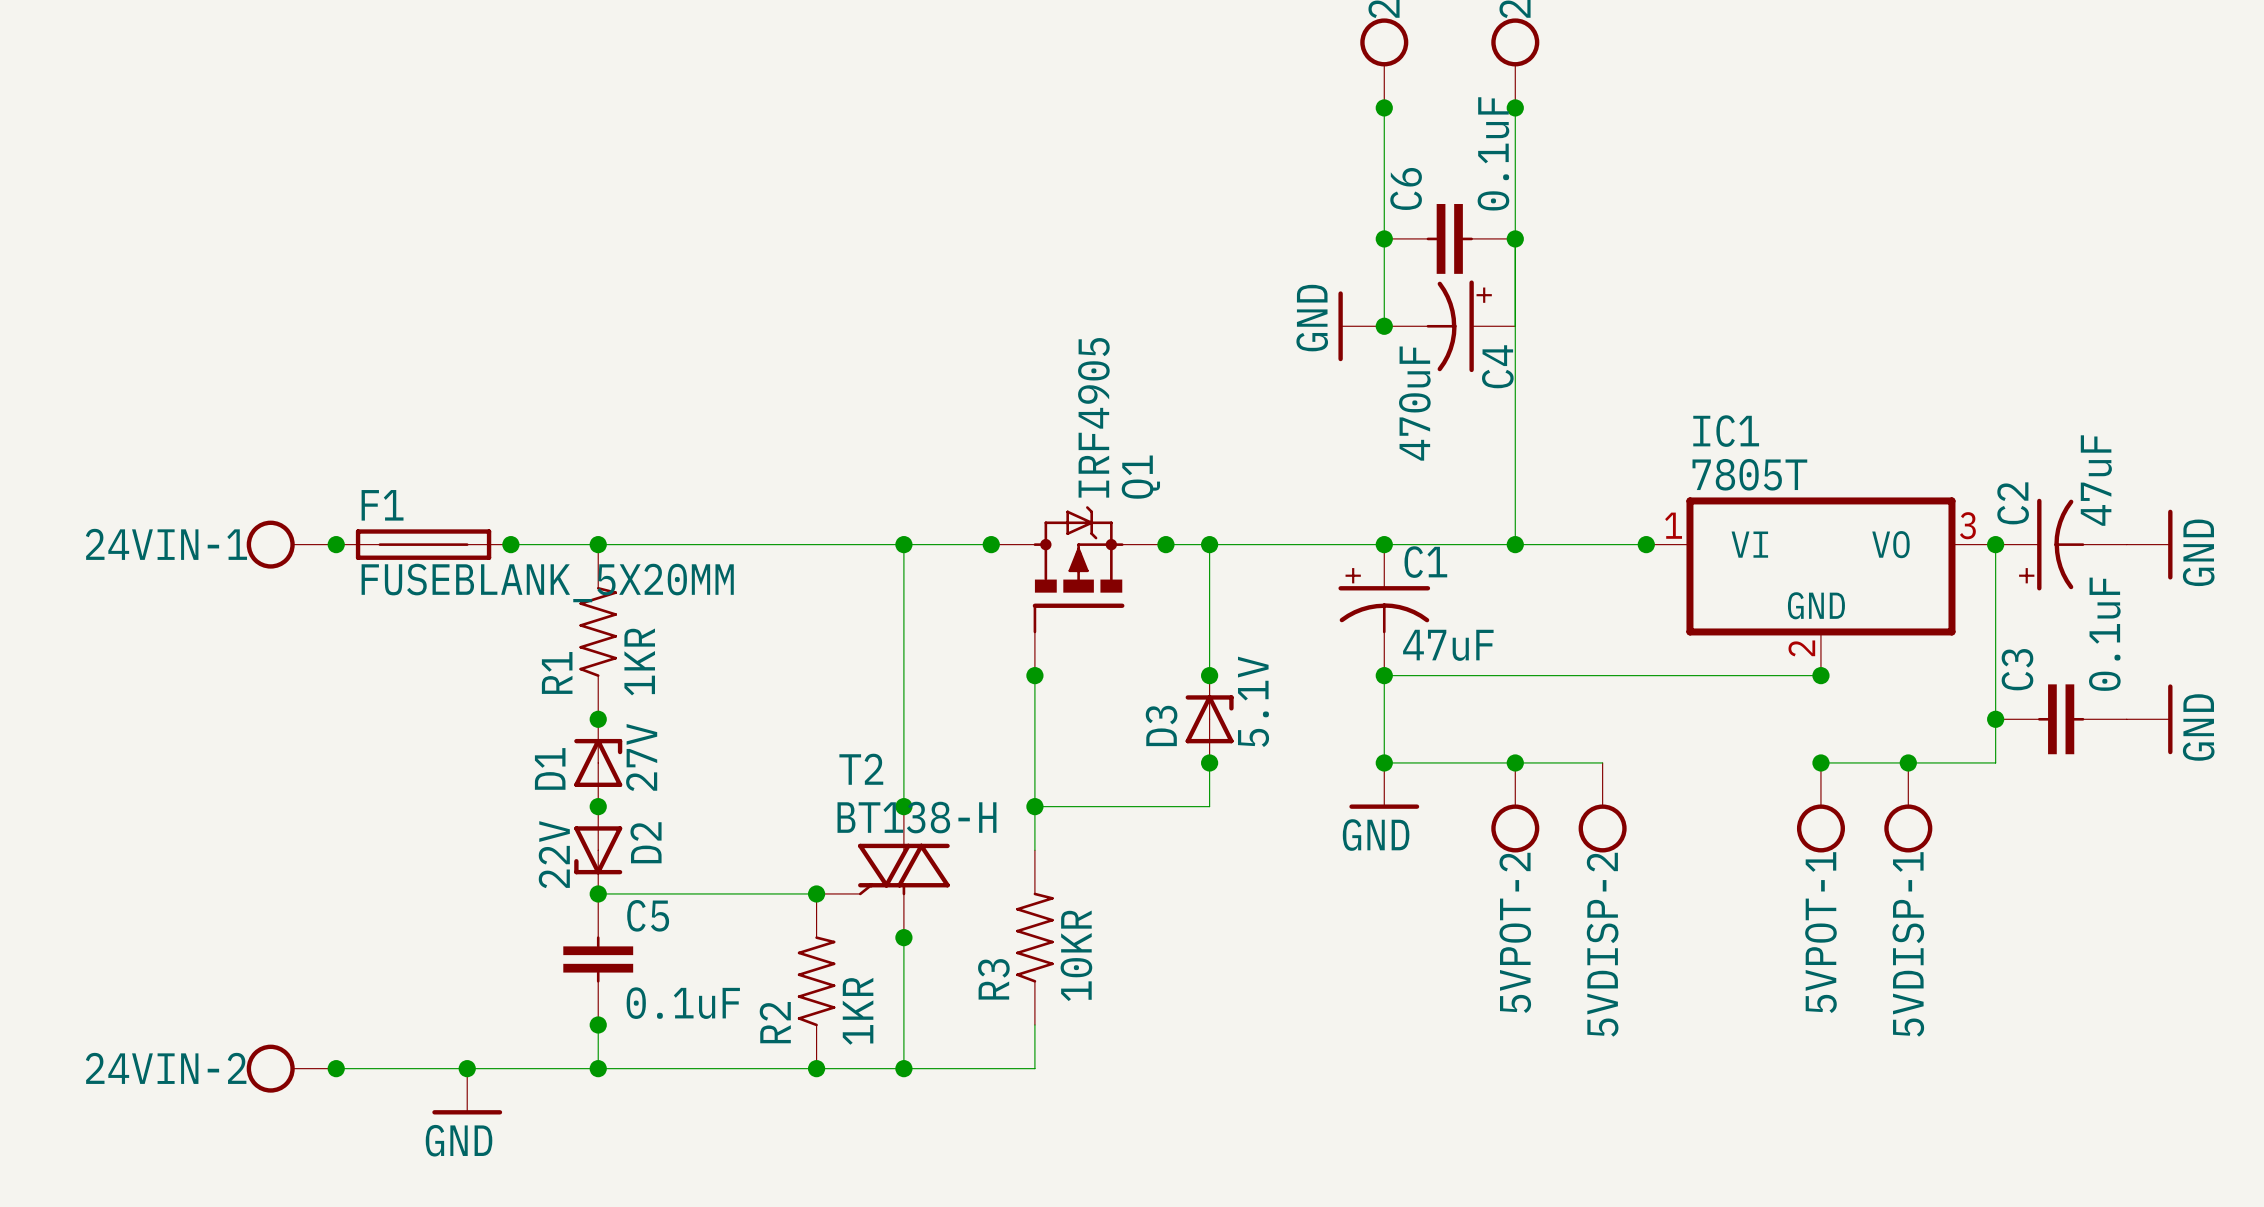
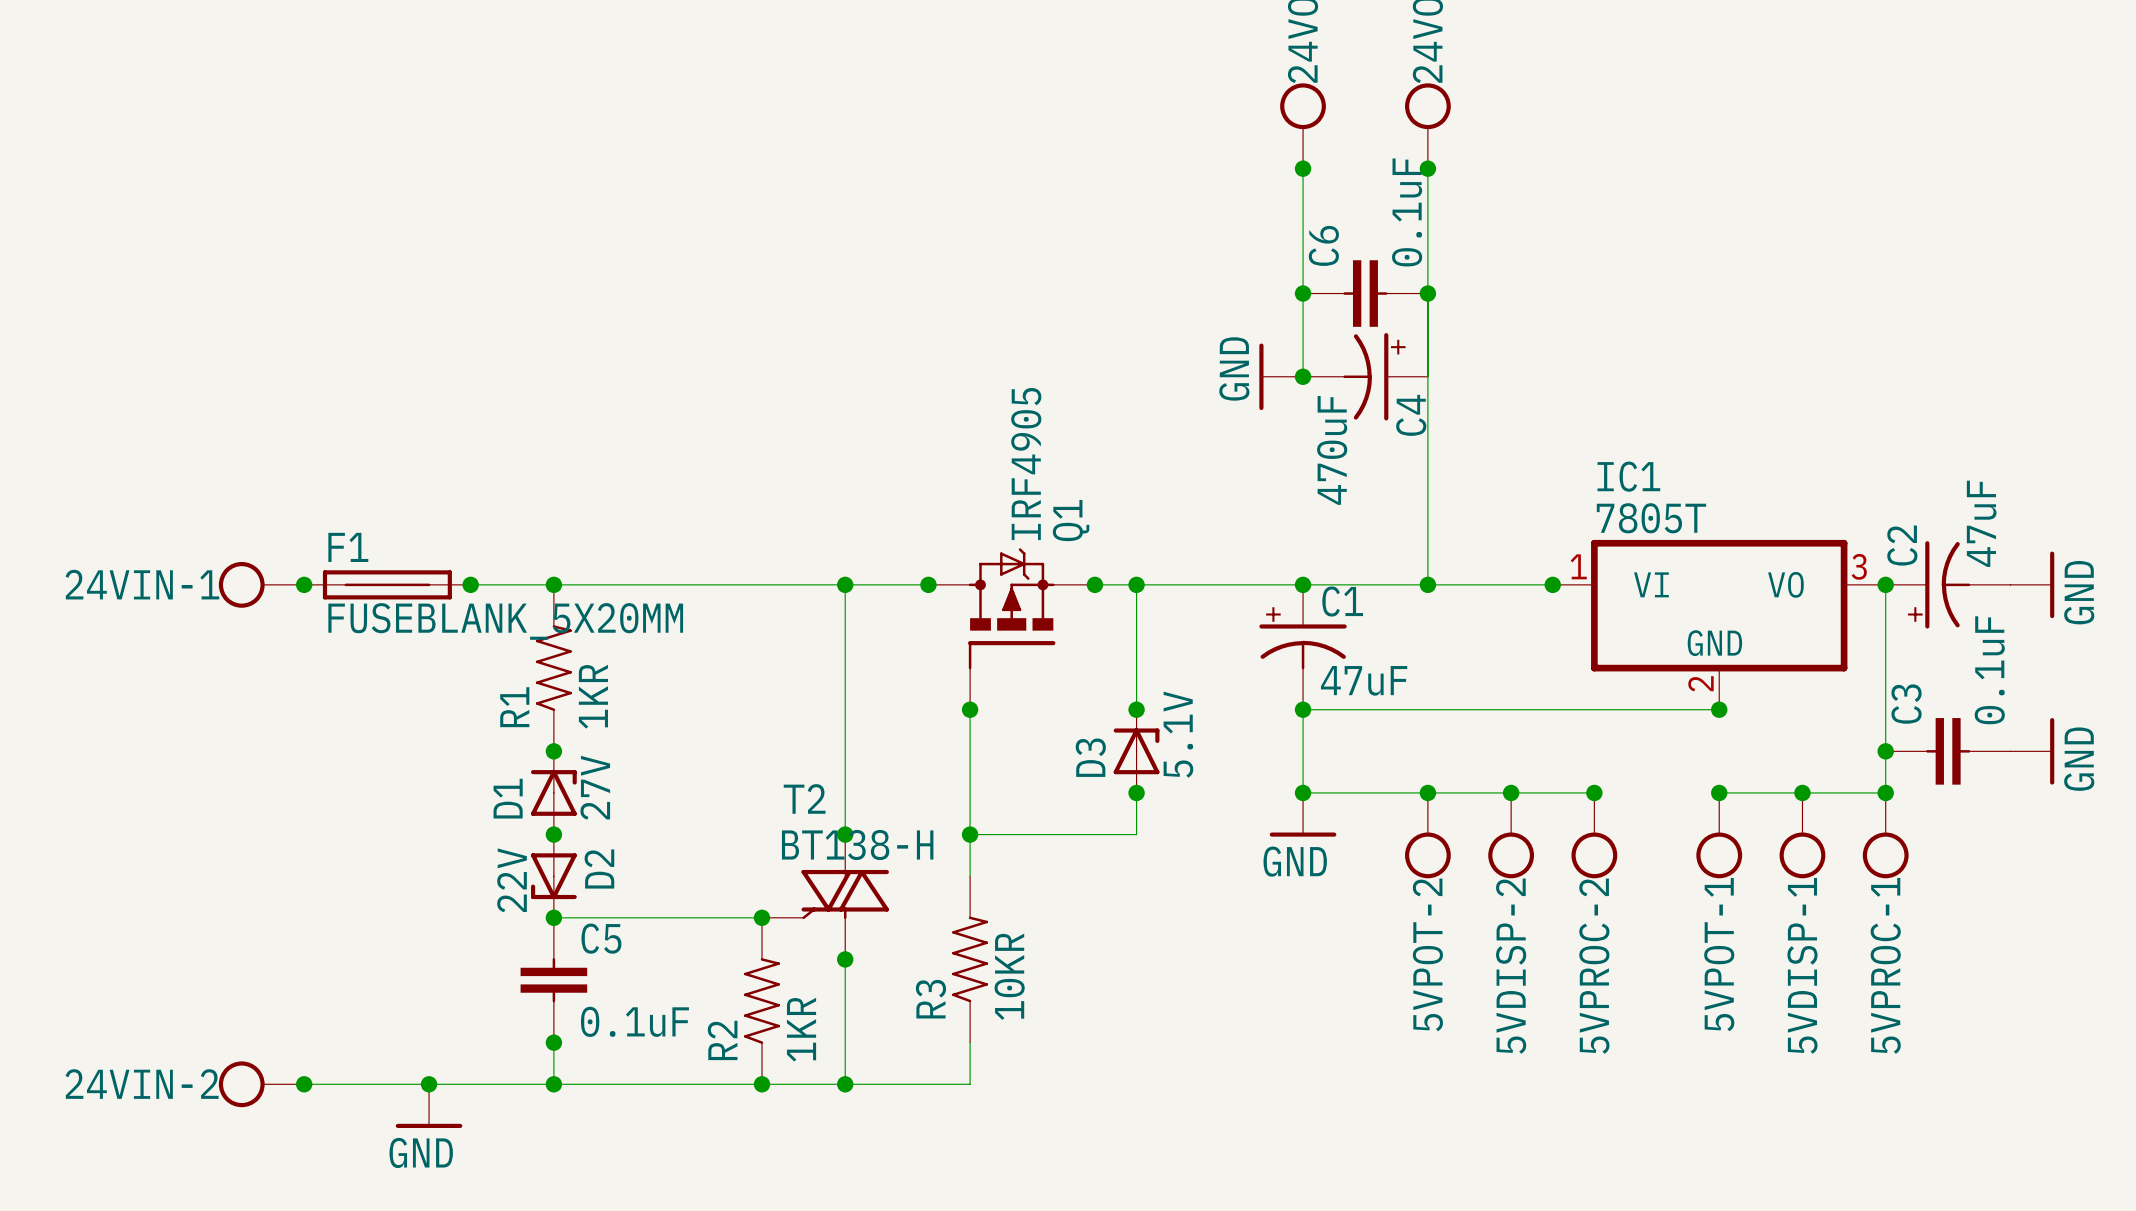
wire: none -> (1511, 792) (1594, 792)
junction: none -> (1511, 792)
junction: none -> (1594, 792)
junction: none -> (1885, 792)
5VPROC-2: none -> (1594, 835)
5VPROC-1: none -> (1885, 835)

